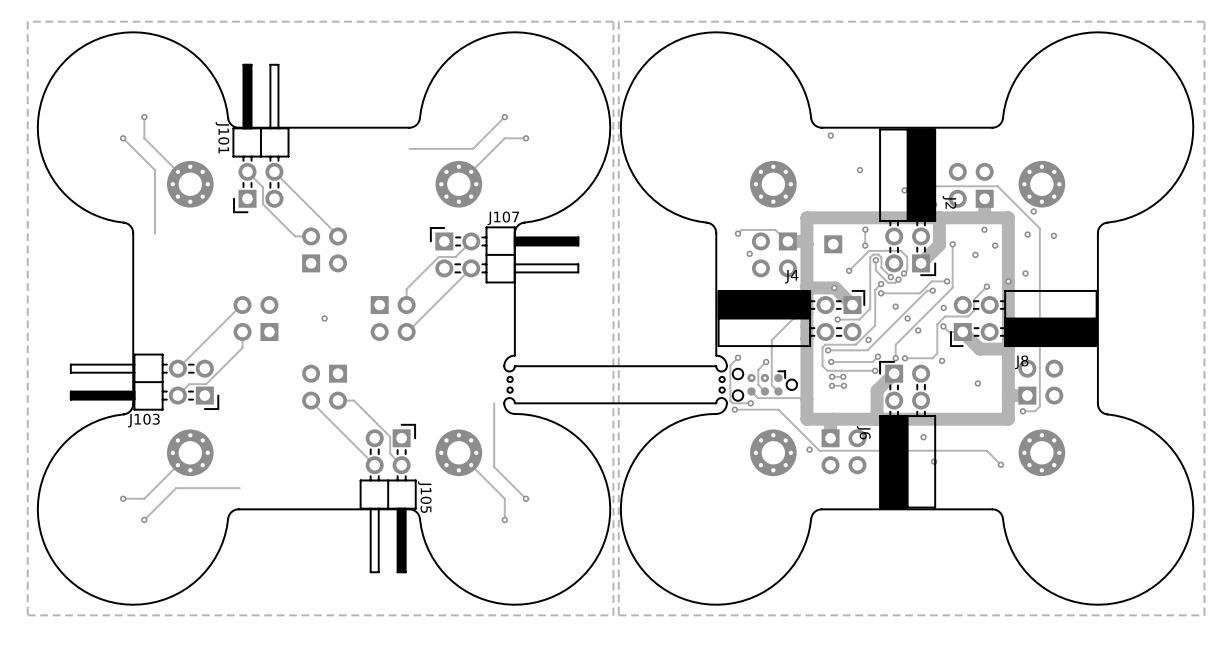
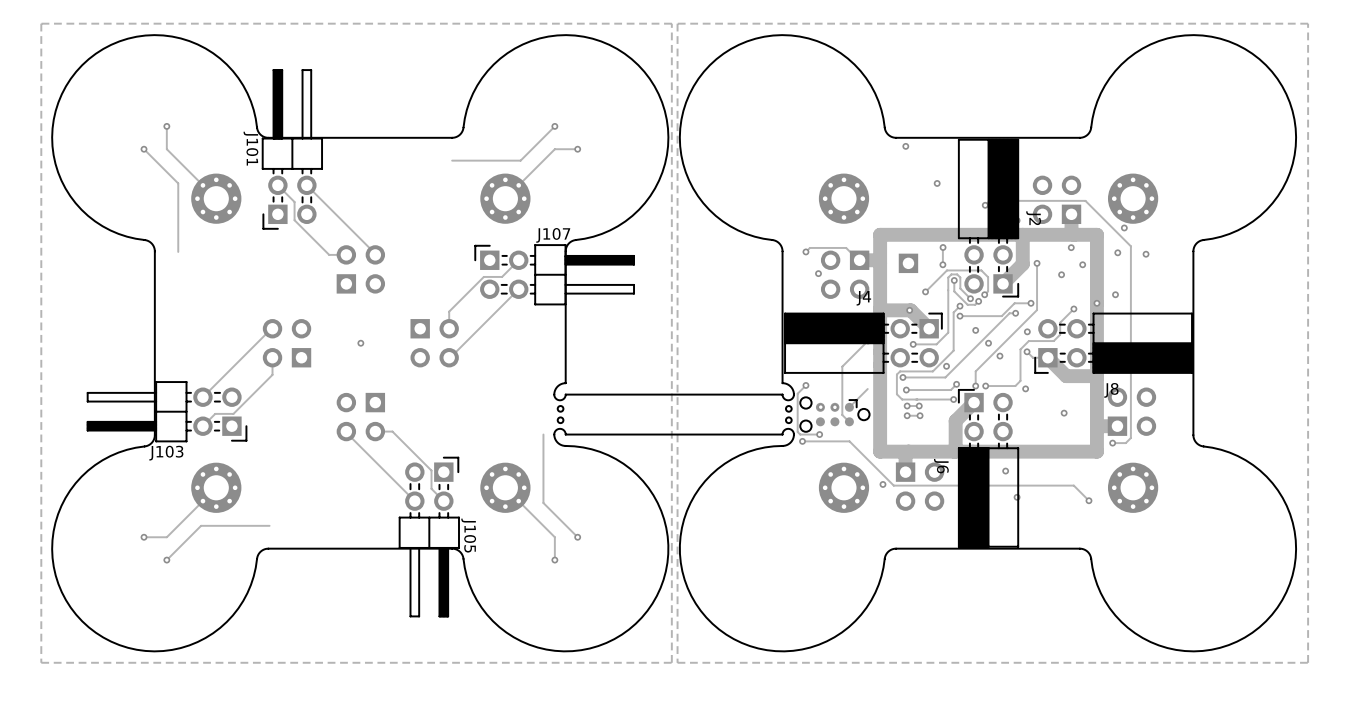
track: (766, 361) (758, 369) (758, 384) (764, 391) -> none
via: (766, 361) -> none
track: none -> (867, 389) (849, 407)
track: (751, 391) (758, 398) (806, 399) -> none

